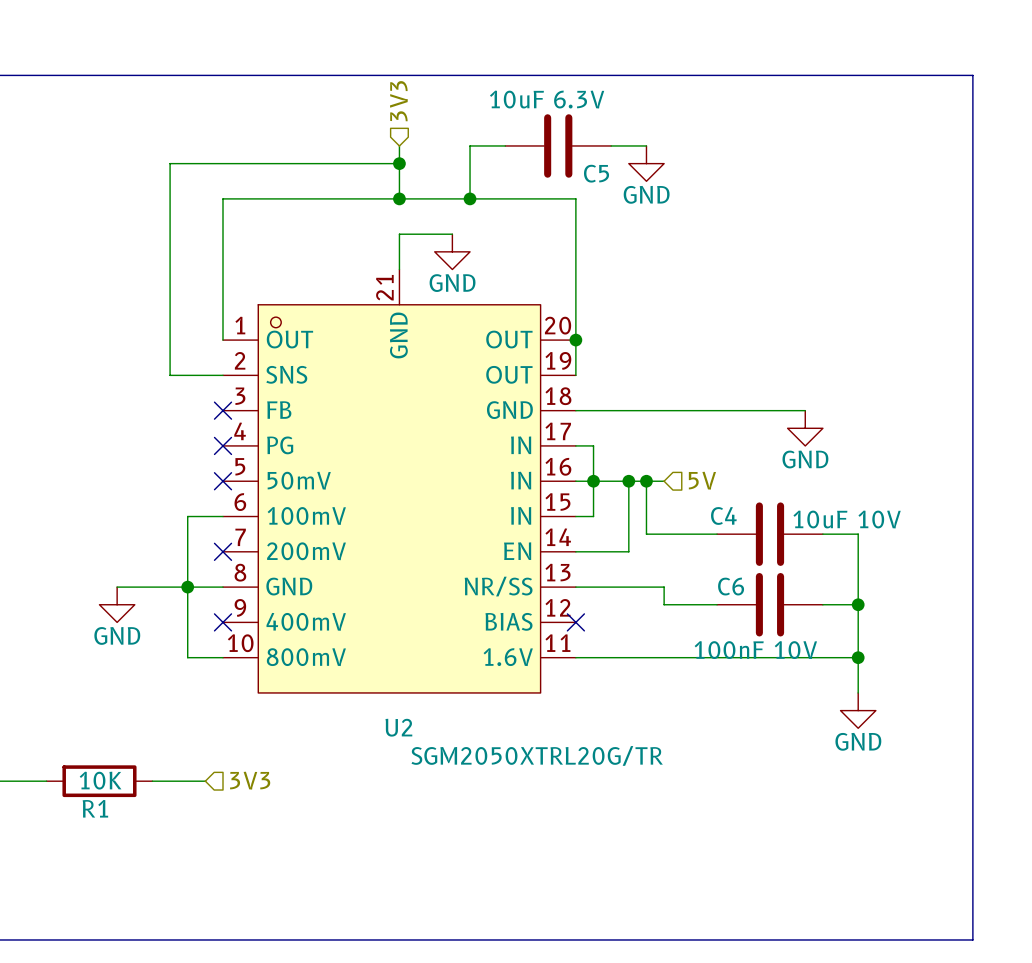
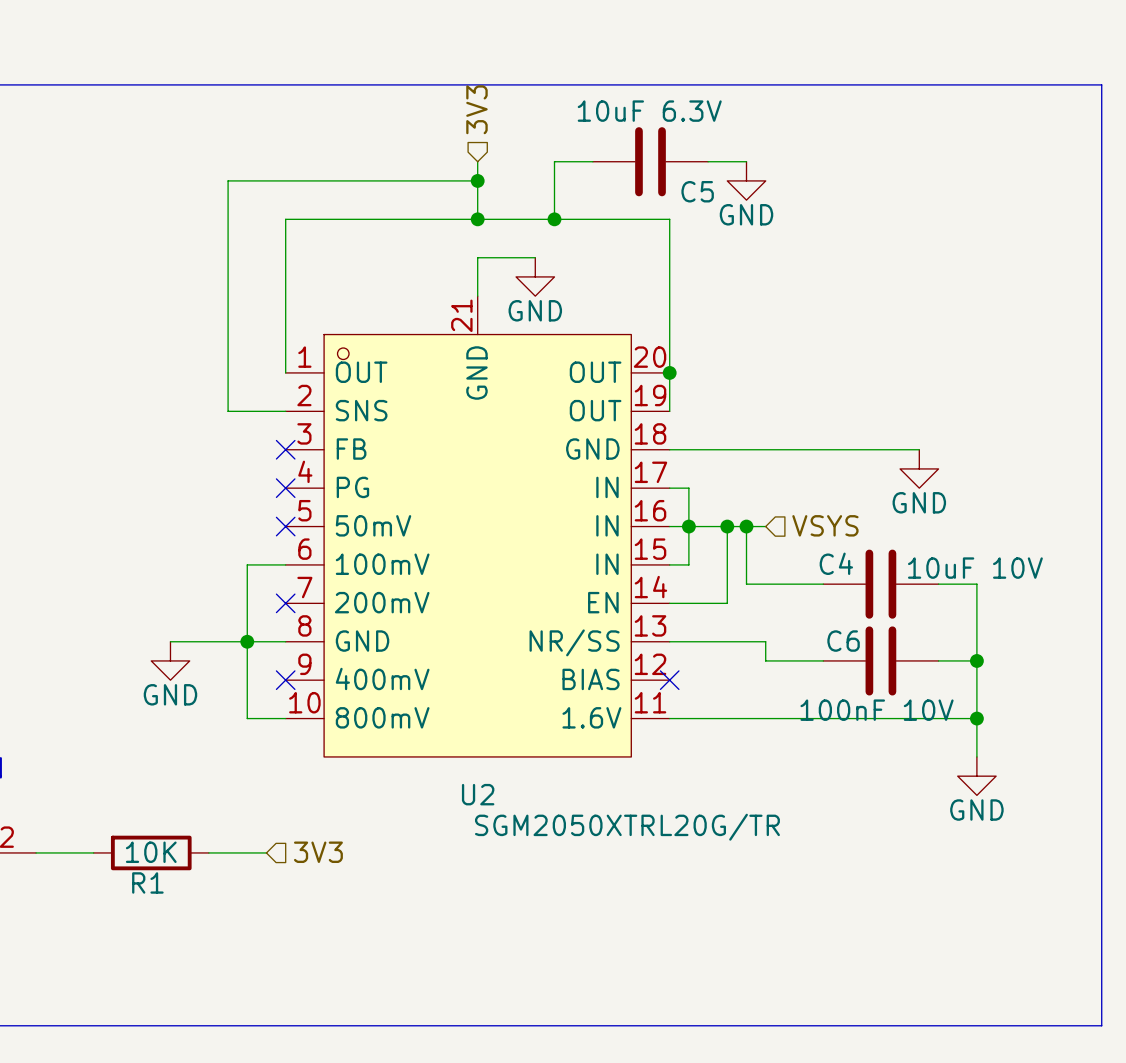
hierarchical label: 5V (702, 480) -> VSYS (825, 525)

